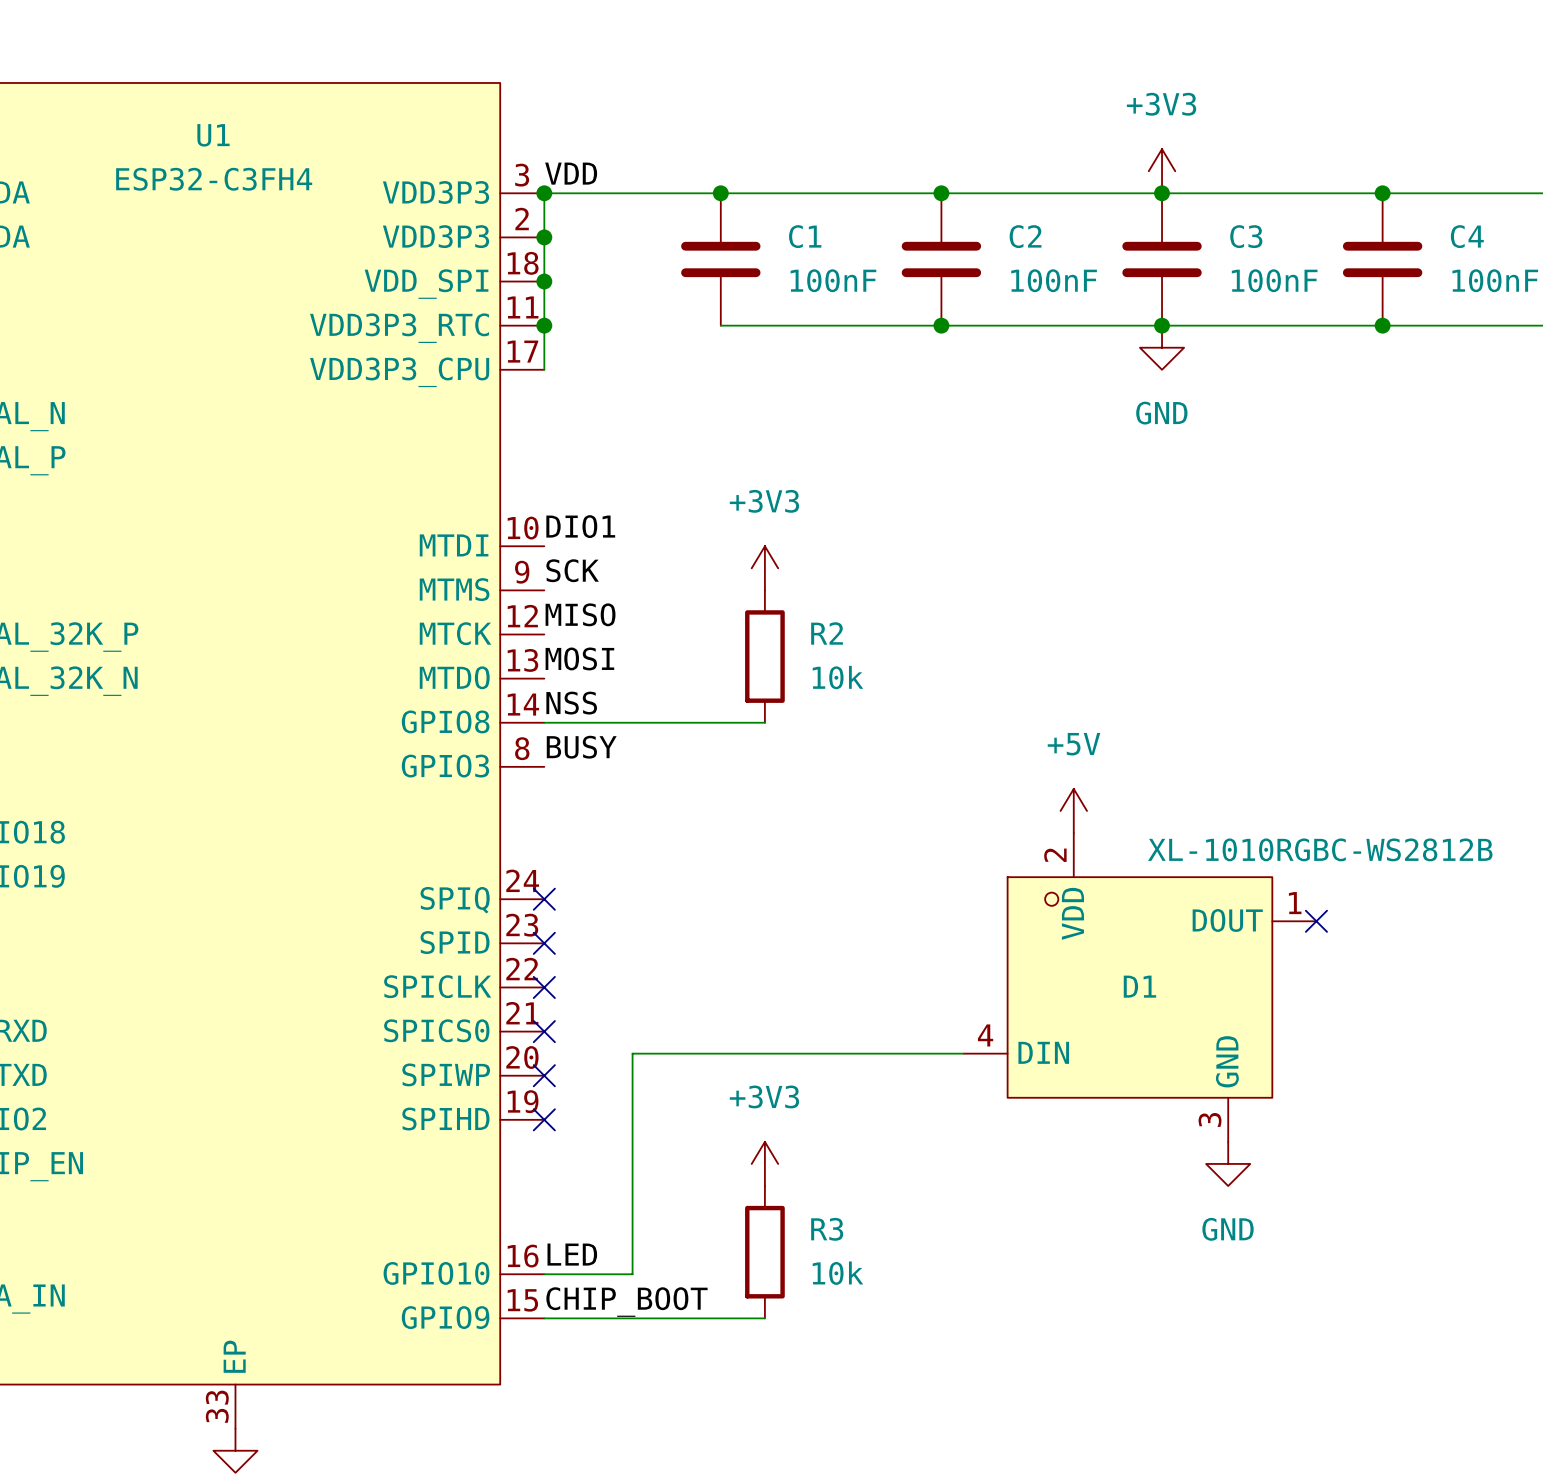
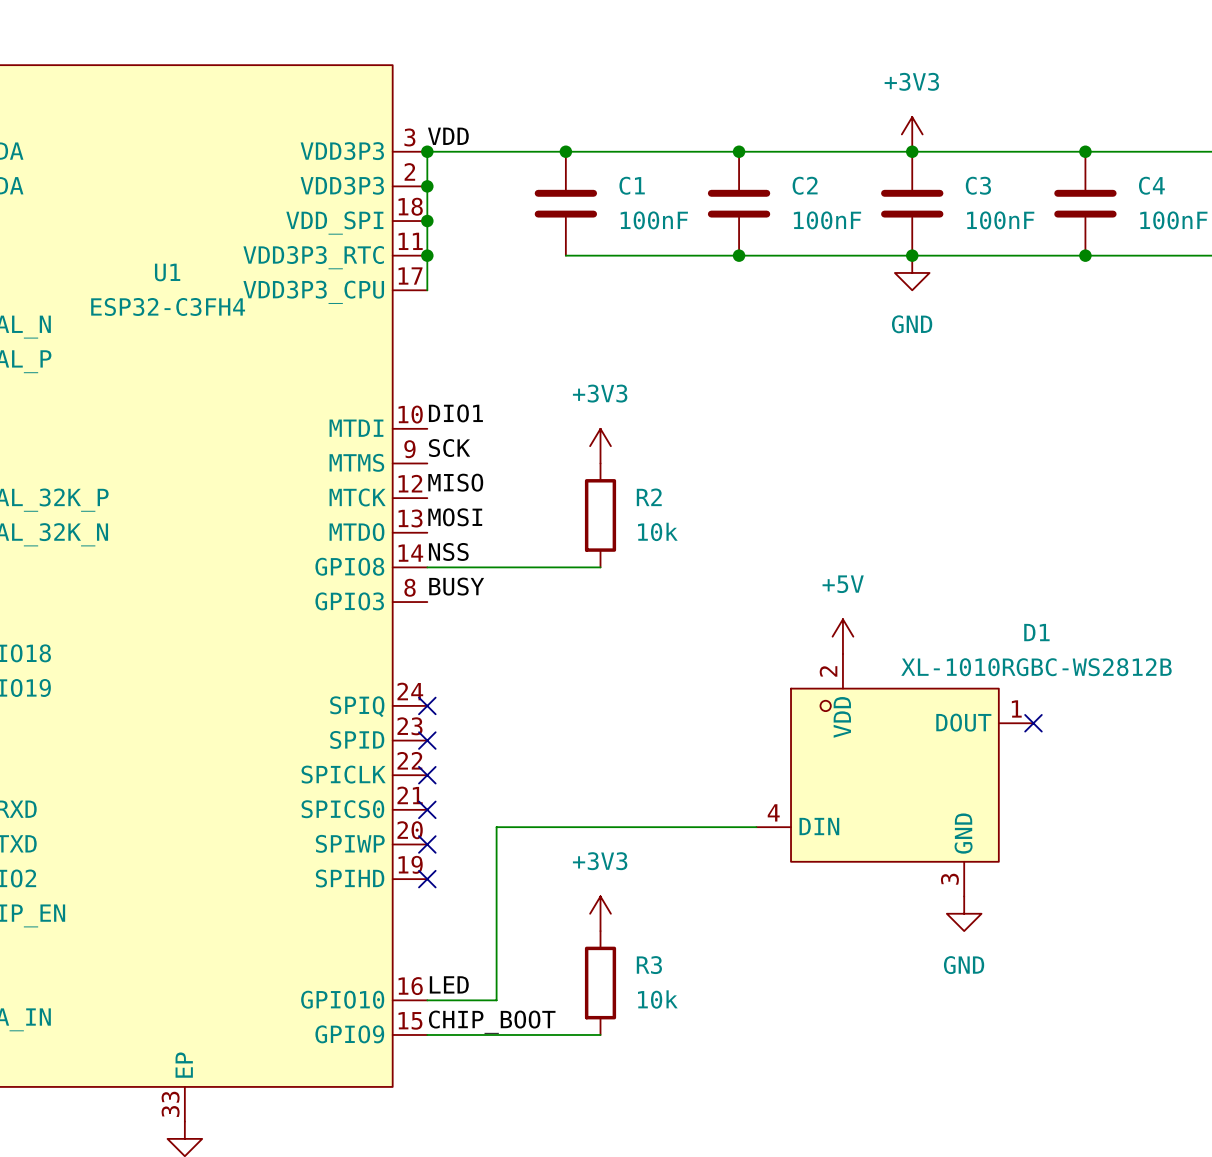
U1 name position: U1 (213, 135) -> U1 (167, 272)
U1 value position: ESP32-C3FH4 (214, 179) -> ESP32-C3FH4 (168, 306)
D1 name position: D1 (1139, 986) -> D1 (1036, 632)

